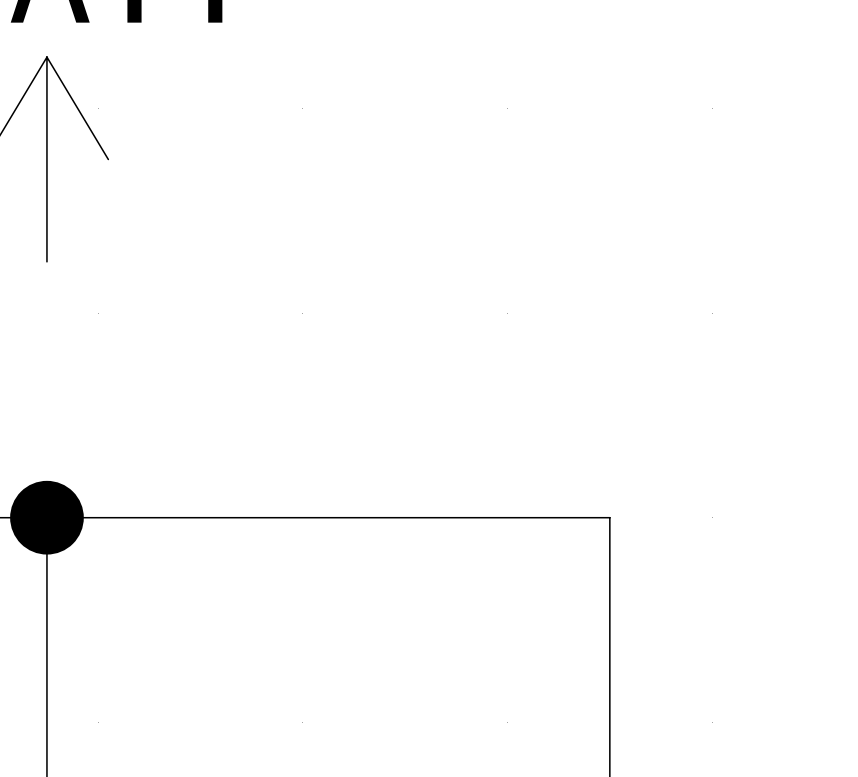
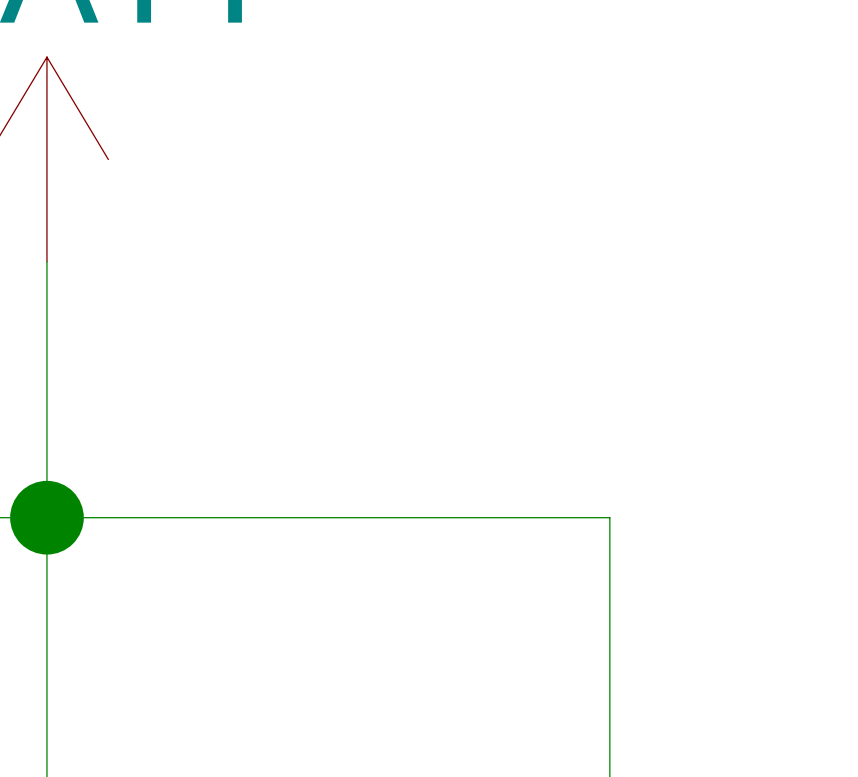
wire: none -> (46, 261) (46, 517)

